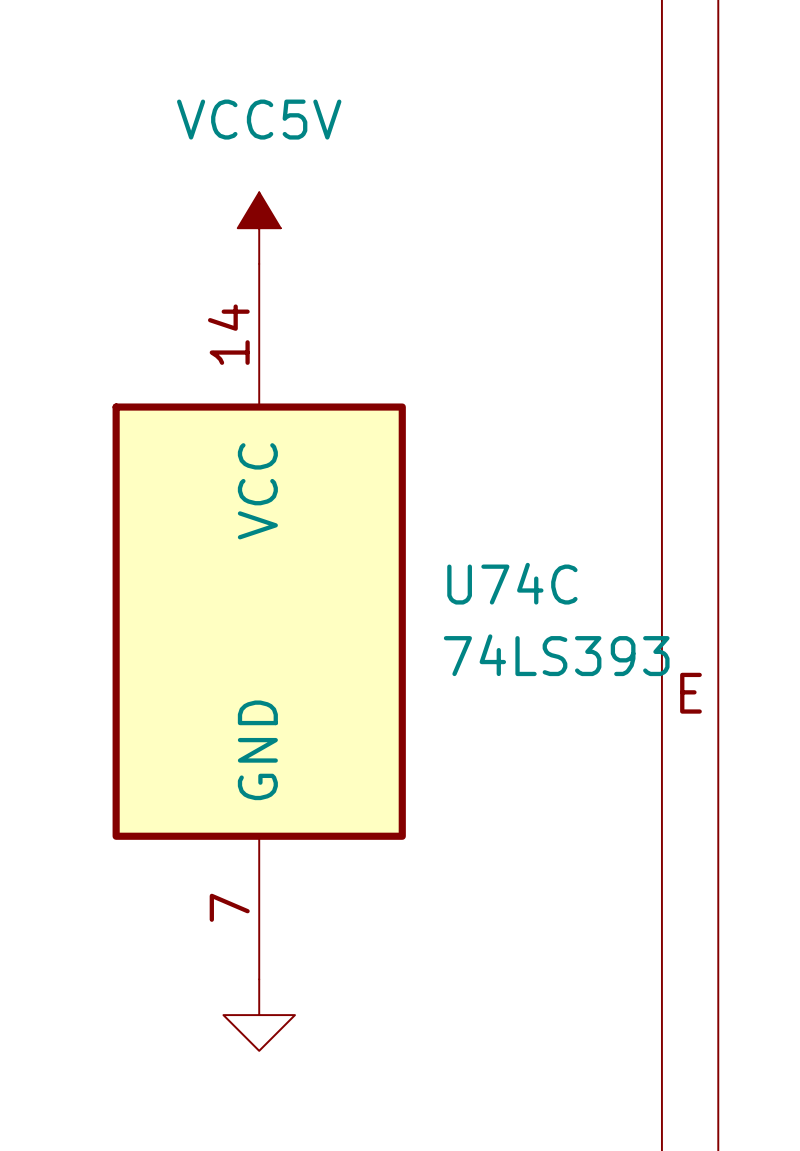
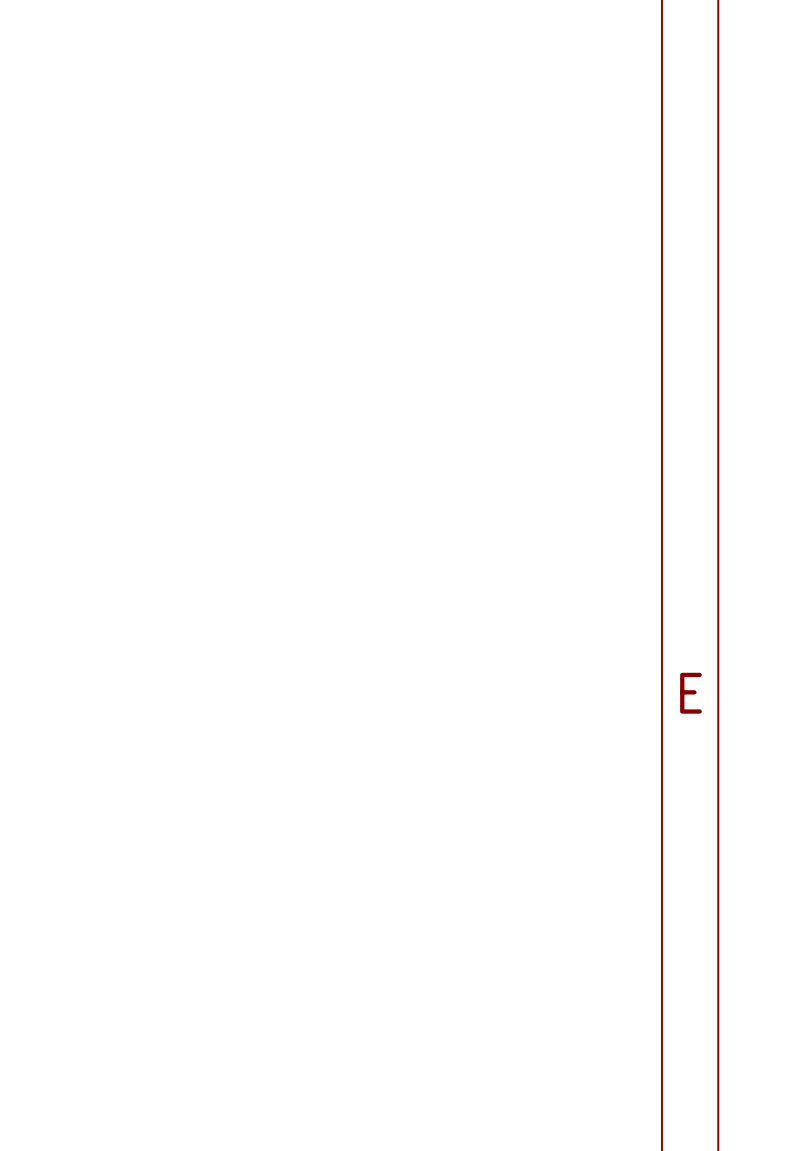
power symbol: VCC5V (259, 228) -> none
U74C: 74LS393 (259, 621) -> none
power symbol: (259, 1015) -> none

